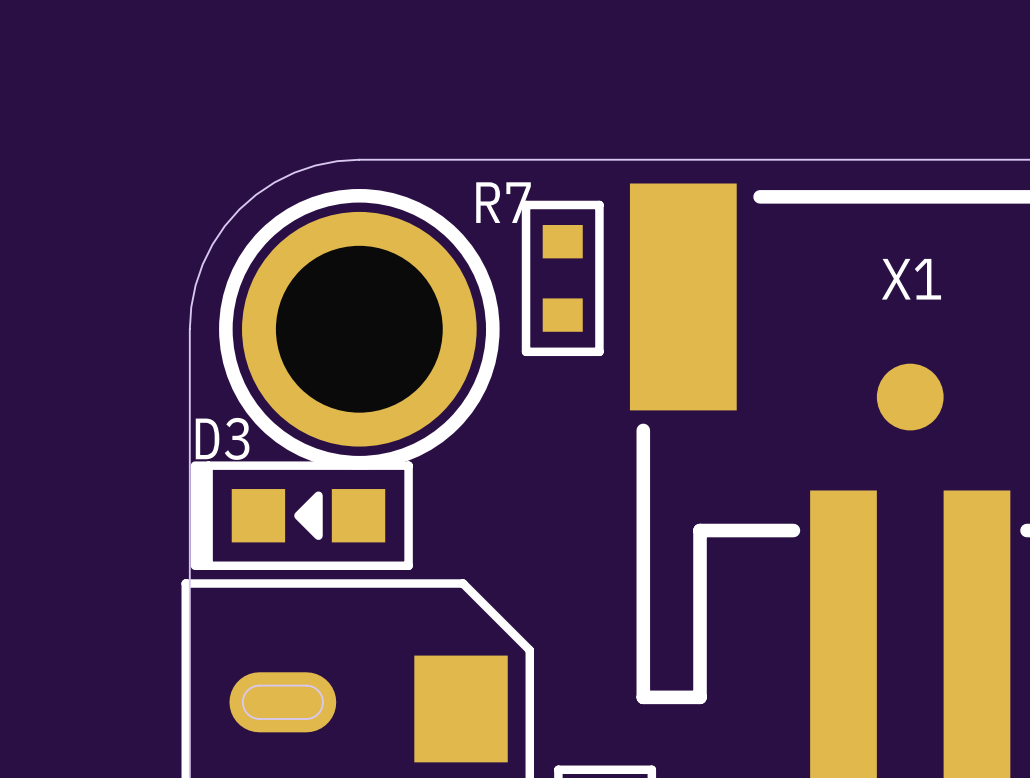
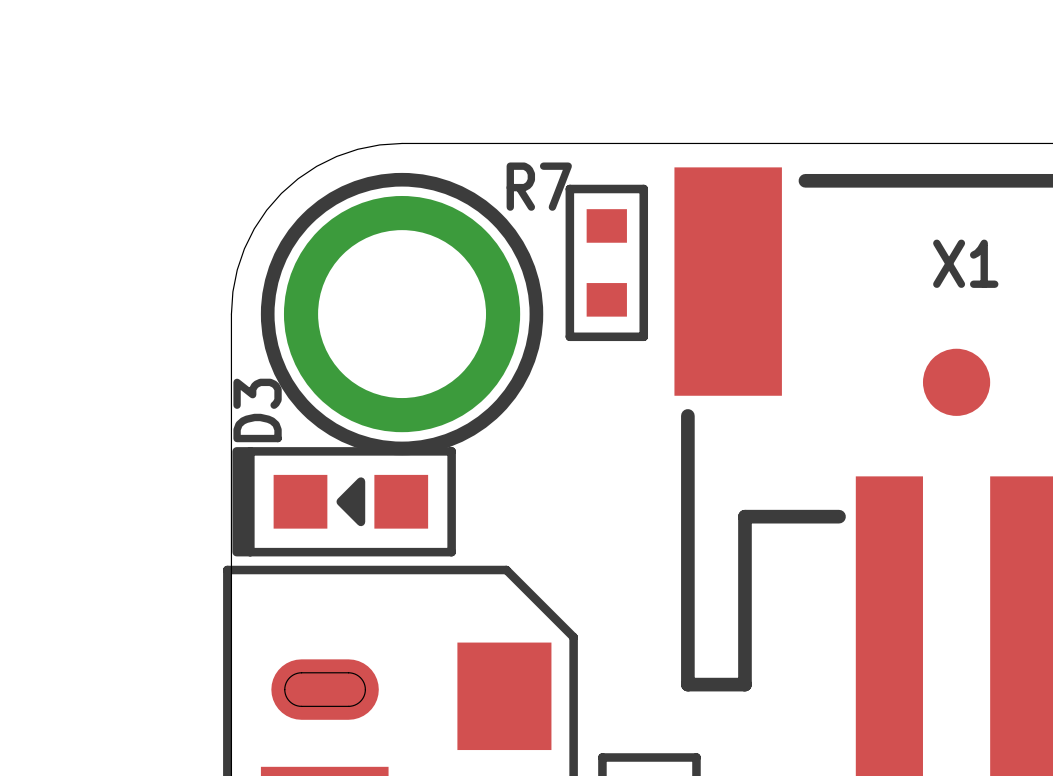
D3 name rotation: 0° (222, 438) -> 90° counterclockwise (257, 410)

